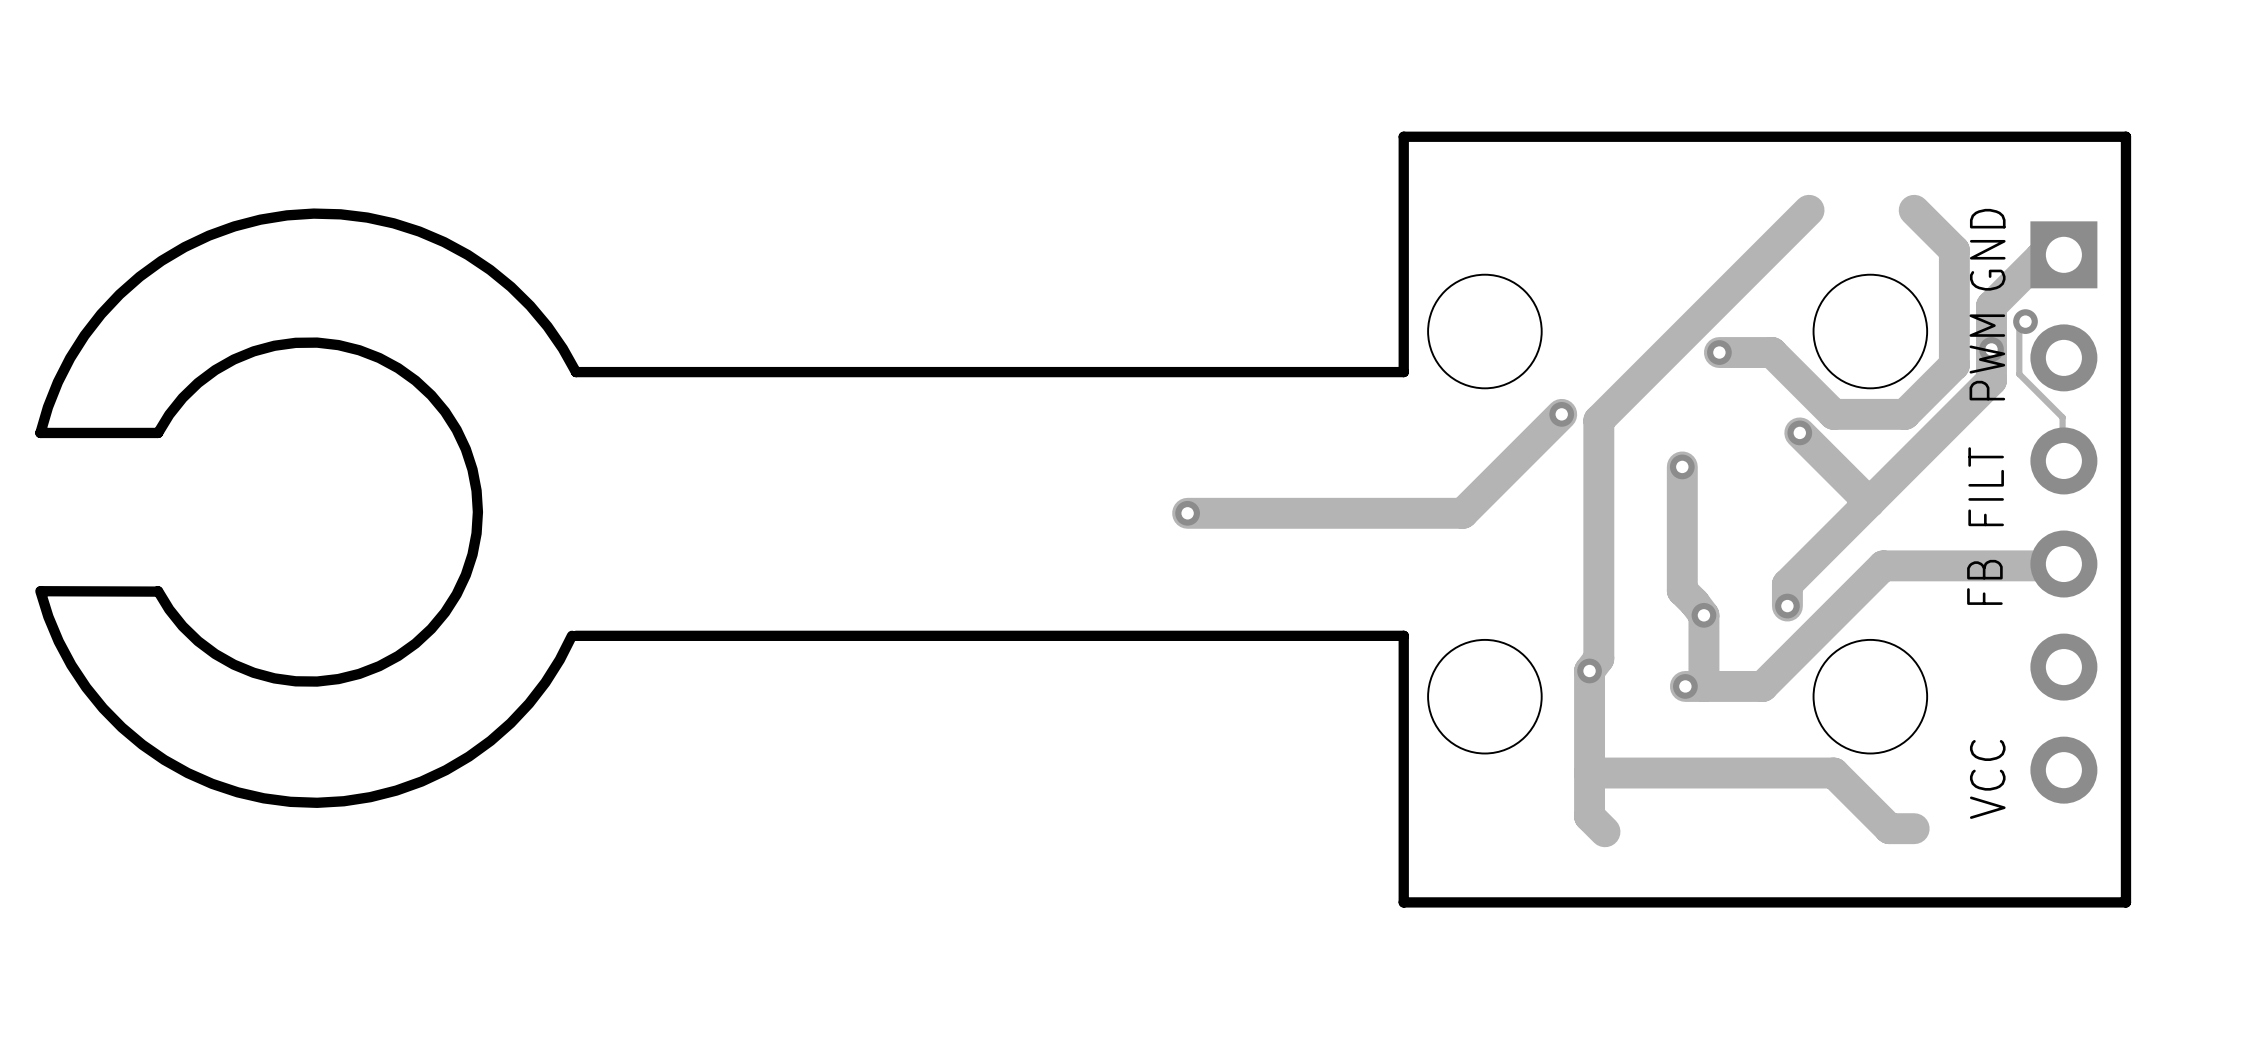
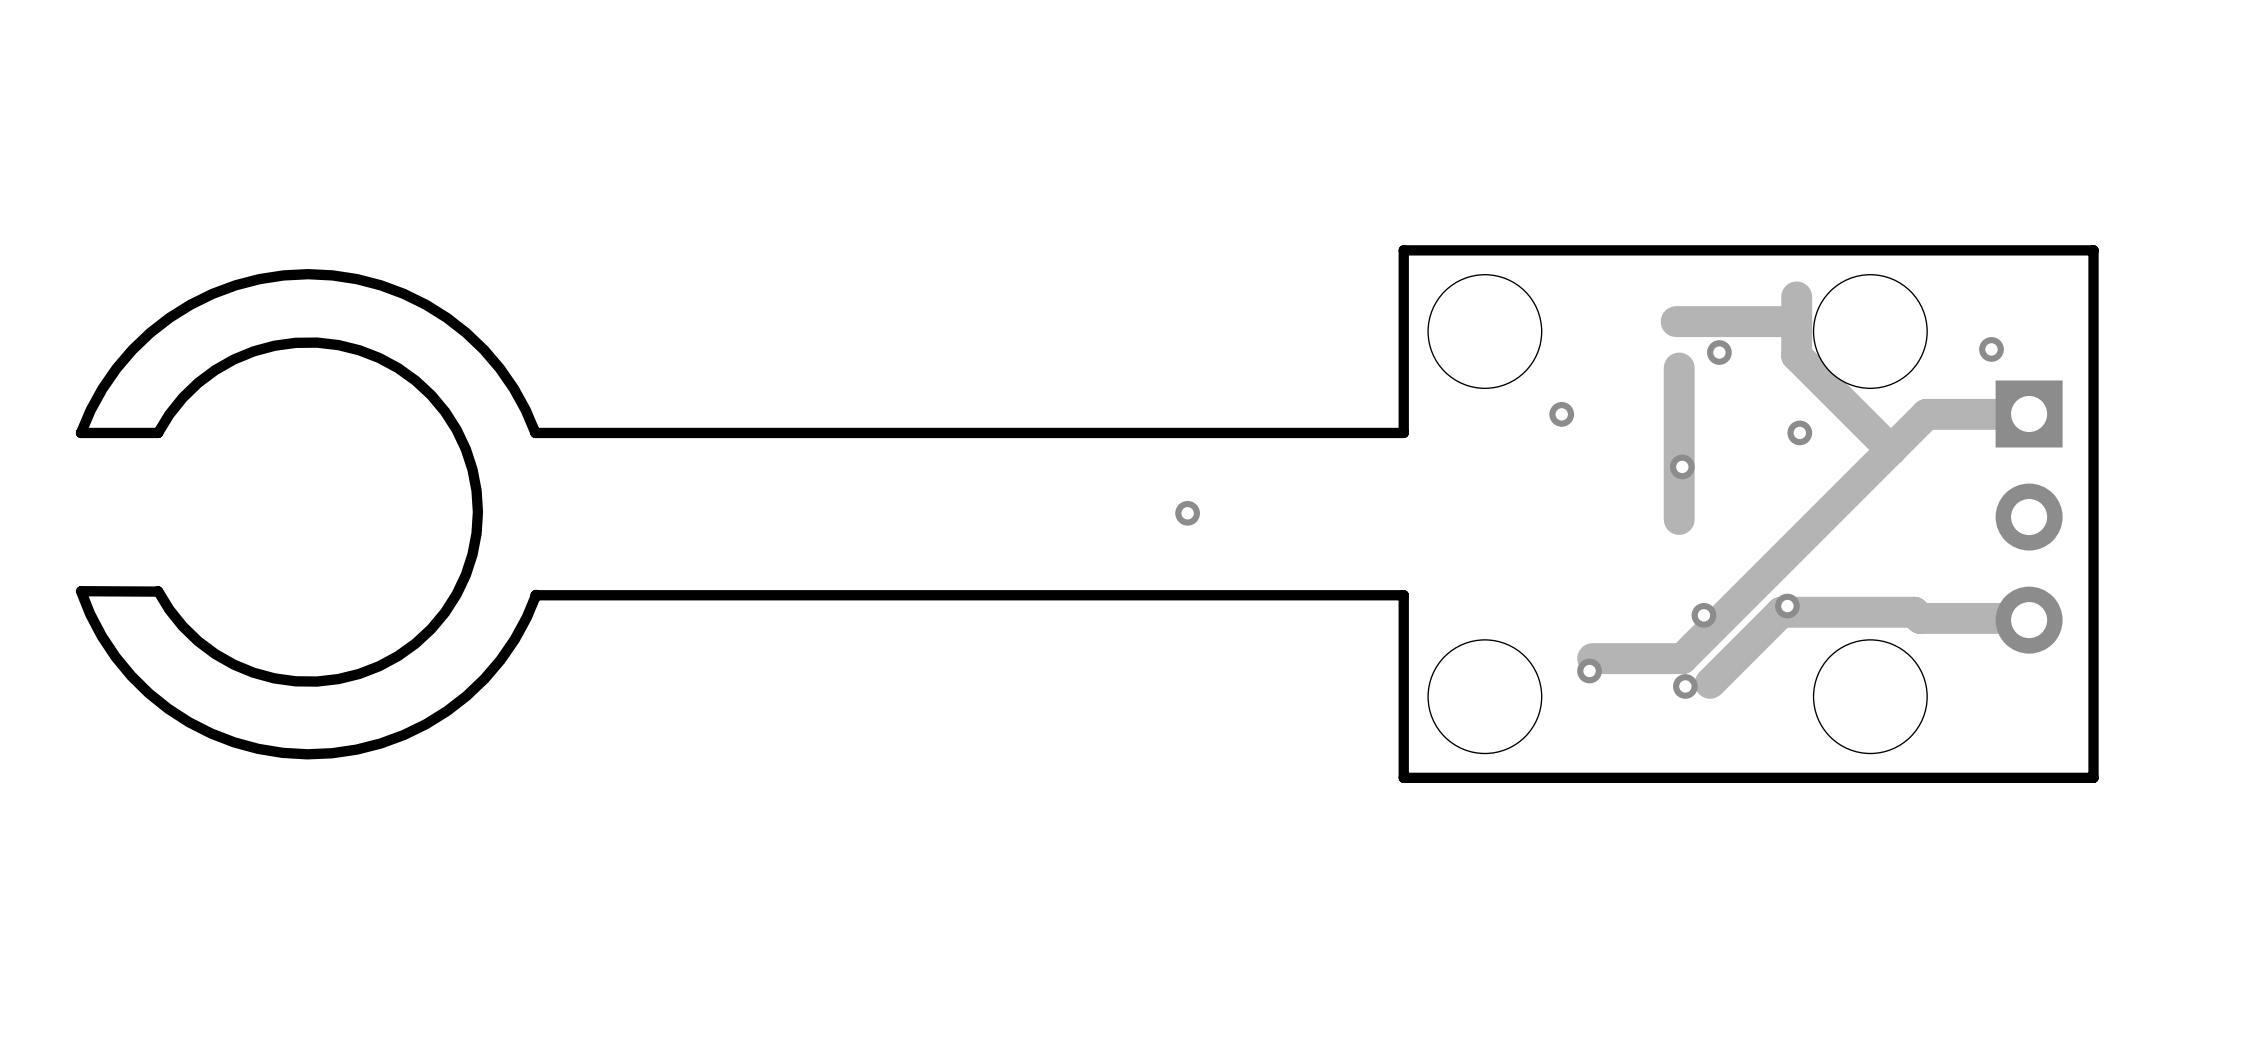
track: (1809, 210) (1598, 420) (1598, 658) (1589, 670) (1589, 816) (1605, 831) -> none
track: (1914, 210) (1954, 250) (1954, 364) (1904, 414) (1833, 414) (1771, 352) (1719, 352) -> none
part footprint: [2030, 221, 2098, 804] -> [1995, 380, 2063, 654]
text: GND (1987, 249) -> none
board edge: (1403, 250) (1403, 136) (2125, 136) (2125, 902) (1403, 902) (1403, 777) -> (1403, 250) (2093, 250) (2093, 777) (1403, 777)
track: (2063, 254) (2062, 256) (2040, 256) (1991, 306) (1991, 380) (1787, 584) (1787, 606) -> none
track: none -> (1796, 296) (1796, 355) (1891, 449)
track: none -> (1796, 321) (1676, 321)
track: (2025, 321) (2019, 327) (2019, 374) (2062, 417) (2063, 460) -> none
via: (2025, 321) -> none
text: PWM (1987, 357) -> none
track: none -> (1679, 367) (1679, 519)
board edge: (1403, 372) (576, 372) (562, 348) (530, 305) (511, 286) (467, 254) (419, 231) (393, 223) (340, 214) (313, 213) (260, 219) (209, 235) (161, 260) (119, 294) (101, 314) (70, 358) (57, 382) (40, 432) (80, 432) -> (1403, 372) (1403, 432) (535, 432) (525, 410) (499, 368) (466, 332) (446, 317) (403, 293) (380, 285) (357, 279) (308, 274) (259, 279) (235, 285) (212, 293) (169, 317) (150, 332) (116, 368) (90, 410) (80, 432)
track: (1561, 414) (1462, 513) (1187, 513) -> none
track: none -> (2028, 414) (1926, 414) (1682, 658) (1592, 658)
track: (1799, 432) (1869, 502) -> none
track: (1682, 466) (1682, 590) (1703, 615) (1703, 686) -> none
text: FILT (1986, 486) -> none
track: (2063, 564) (2062, 565) (1883, 565) (1762, 686) (1685, 686) -> none
text: FB (1984, 582) -> none
board edge: (40, 591) (58, 641) (86, 687) (103, 708) (142, 744) (187, 773) (212, 783) (263, 798) (290, 801) (343, 801) (370, 797) (396, 790) (445, 770) (490, 740) (529, 703) (559, 659) (571, 635) -> none
board edge: (41, 591) (158, 591) -> (81, 591) (158, 591)
board edge: none -> (80, 591) (101, 636) (115, 656) (131, 675) (168, 708) (189, 722) (234, 742) (282, 752) (307, 754) (332, 753) (380, 743) (403, 735) (447, 711) (466, 695) (500, 659) (526, 617) (536, 594)
track: none -> (2029, 620) (2028, 618) (1920, 618) (1914, 612) (1781, 612) (1710, 683)
board edge: (1403, 635) (576, 635) -> (1403, 635) (1403, 595) (535, 595)
track: (1589, 773) (1833, 773) (1889, 828) (1914, 828) -> none
text: VCC (1987, 779) -> none

